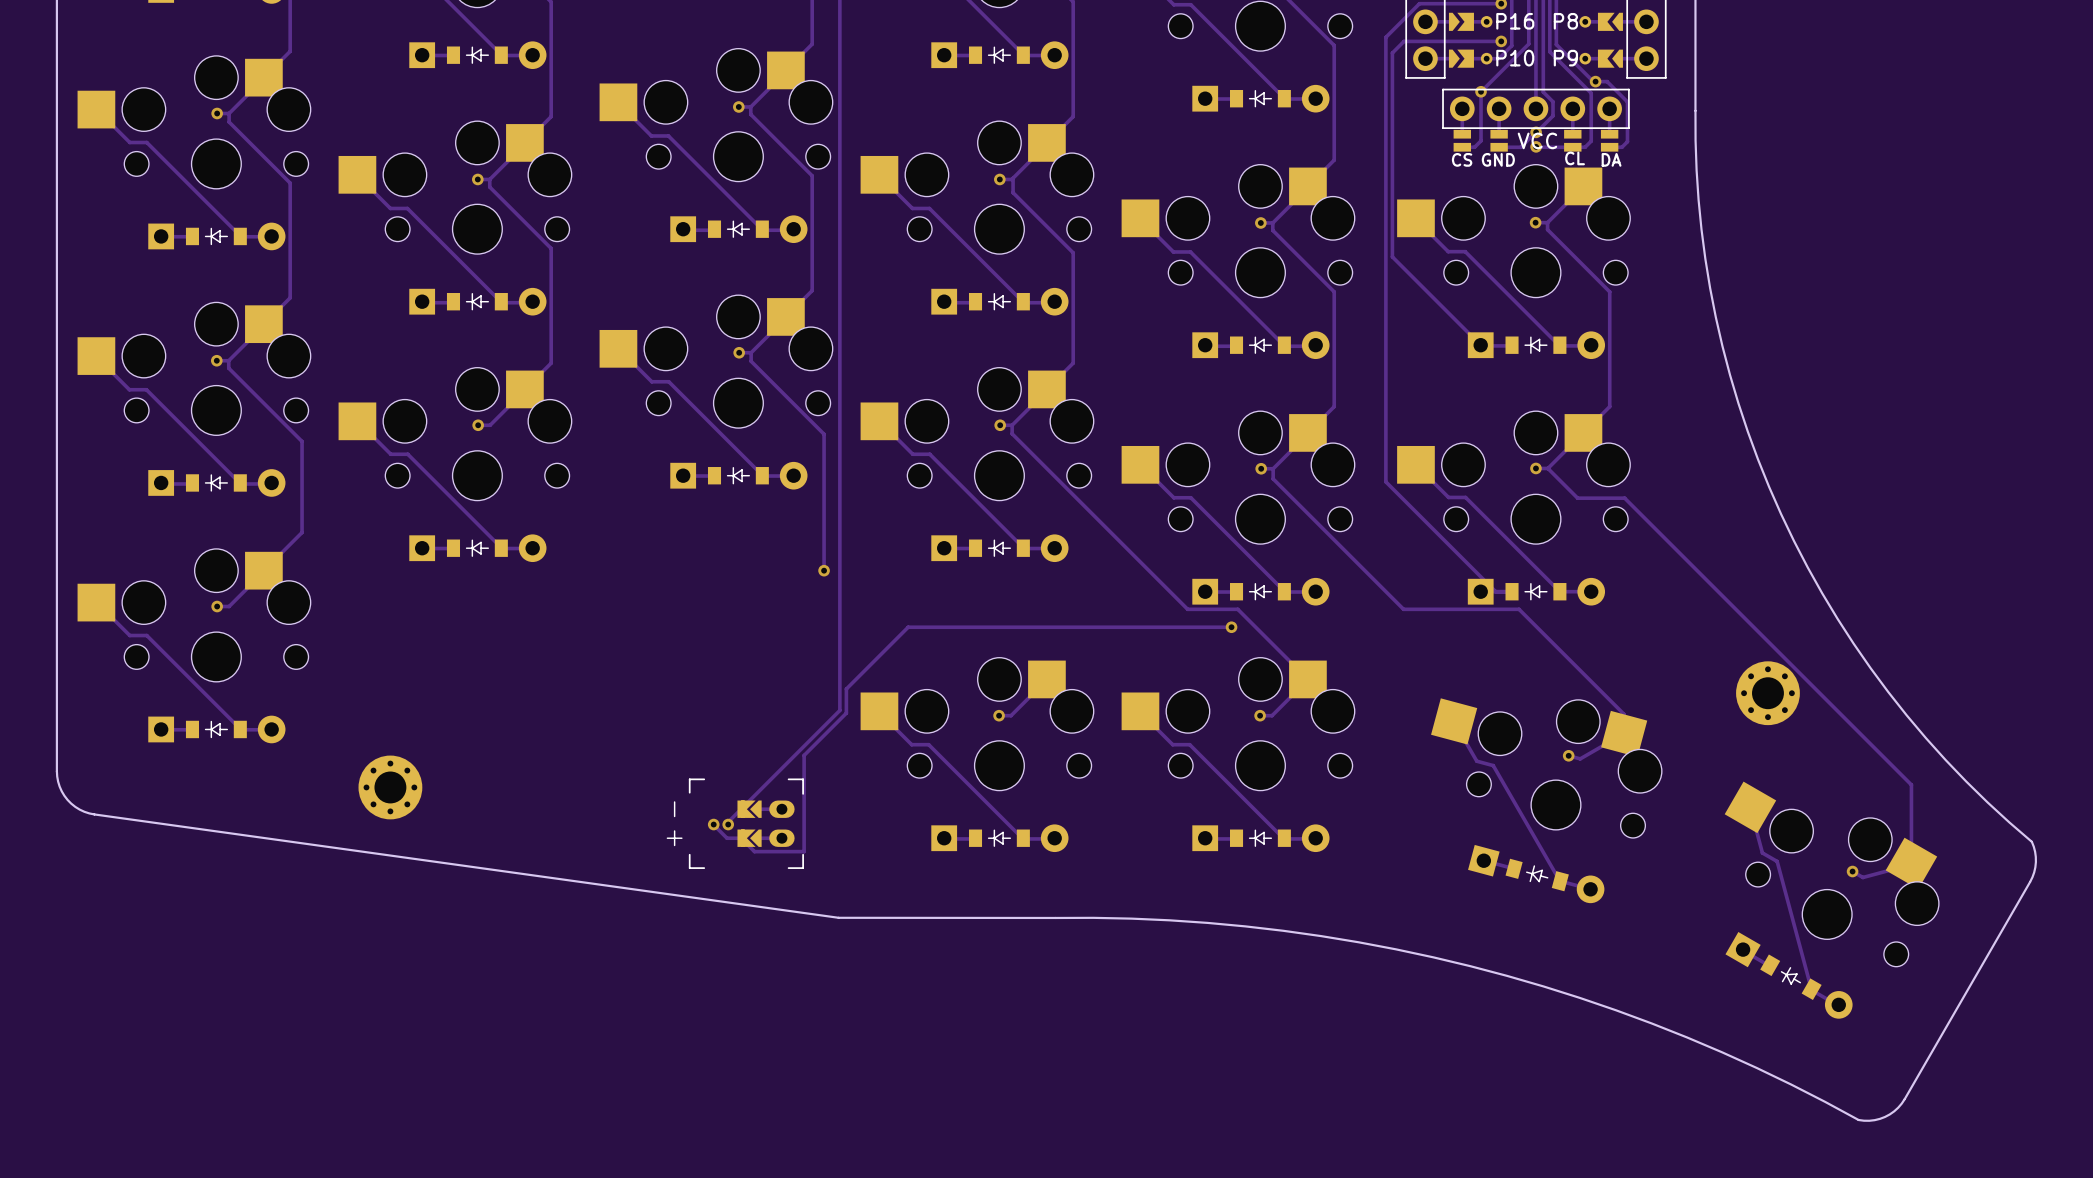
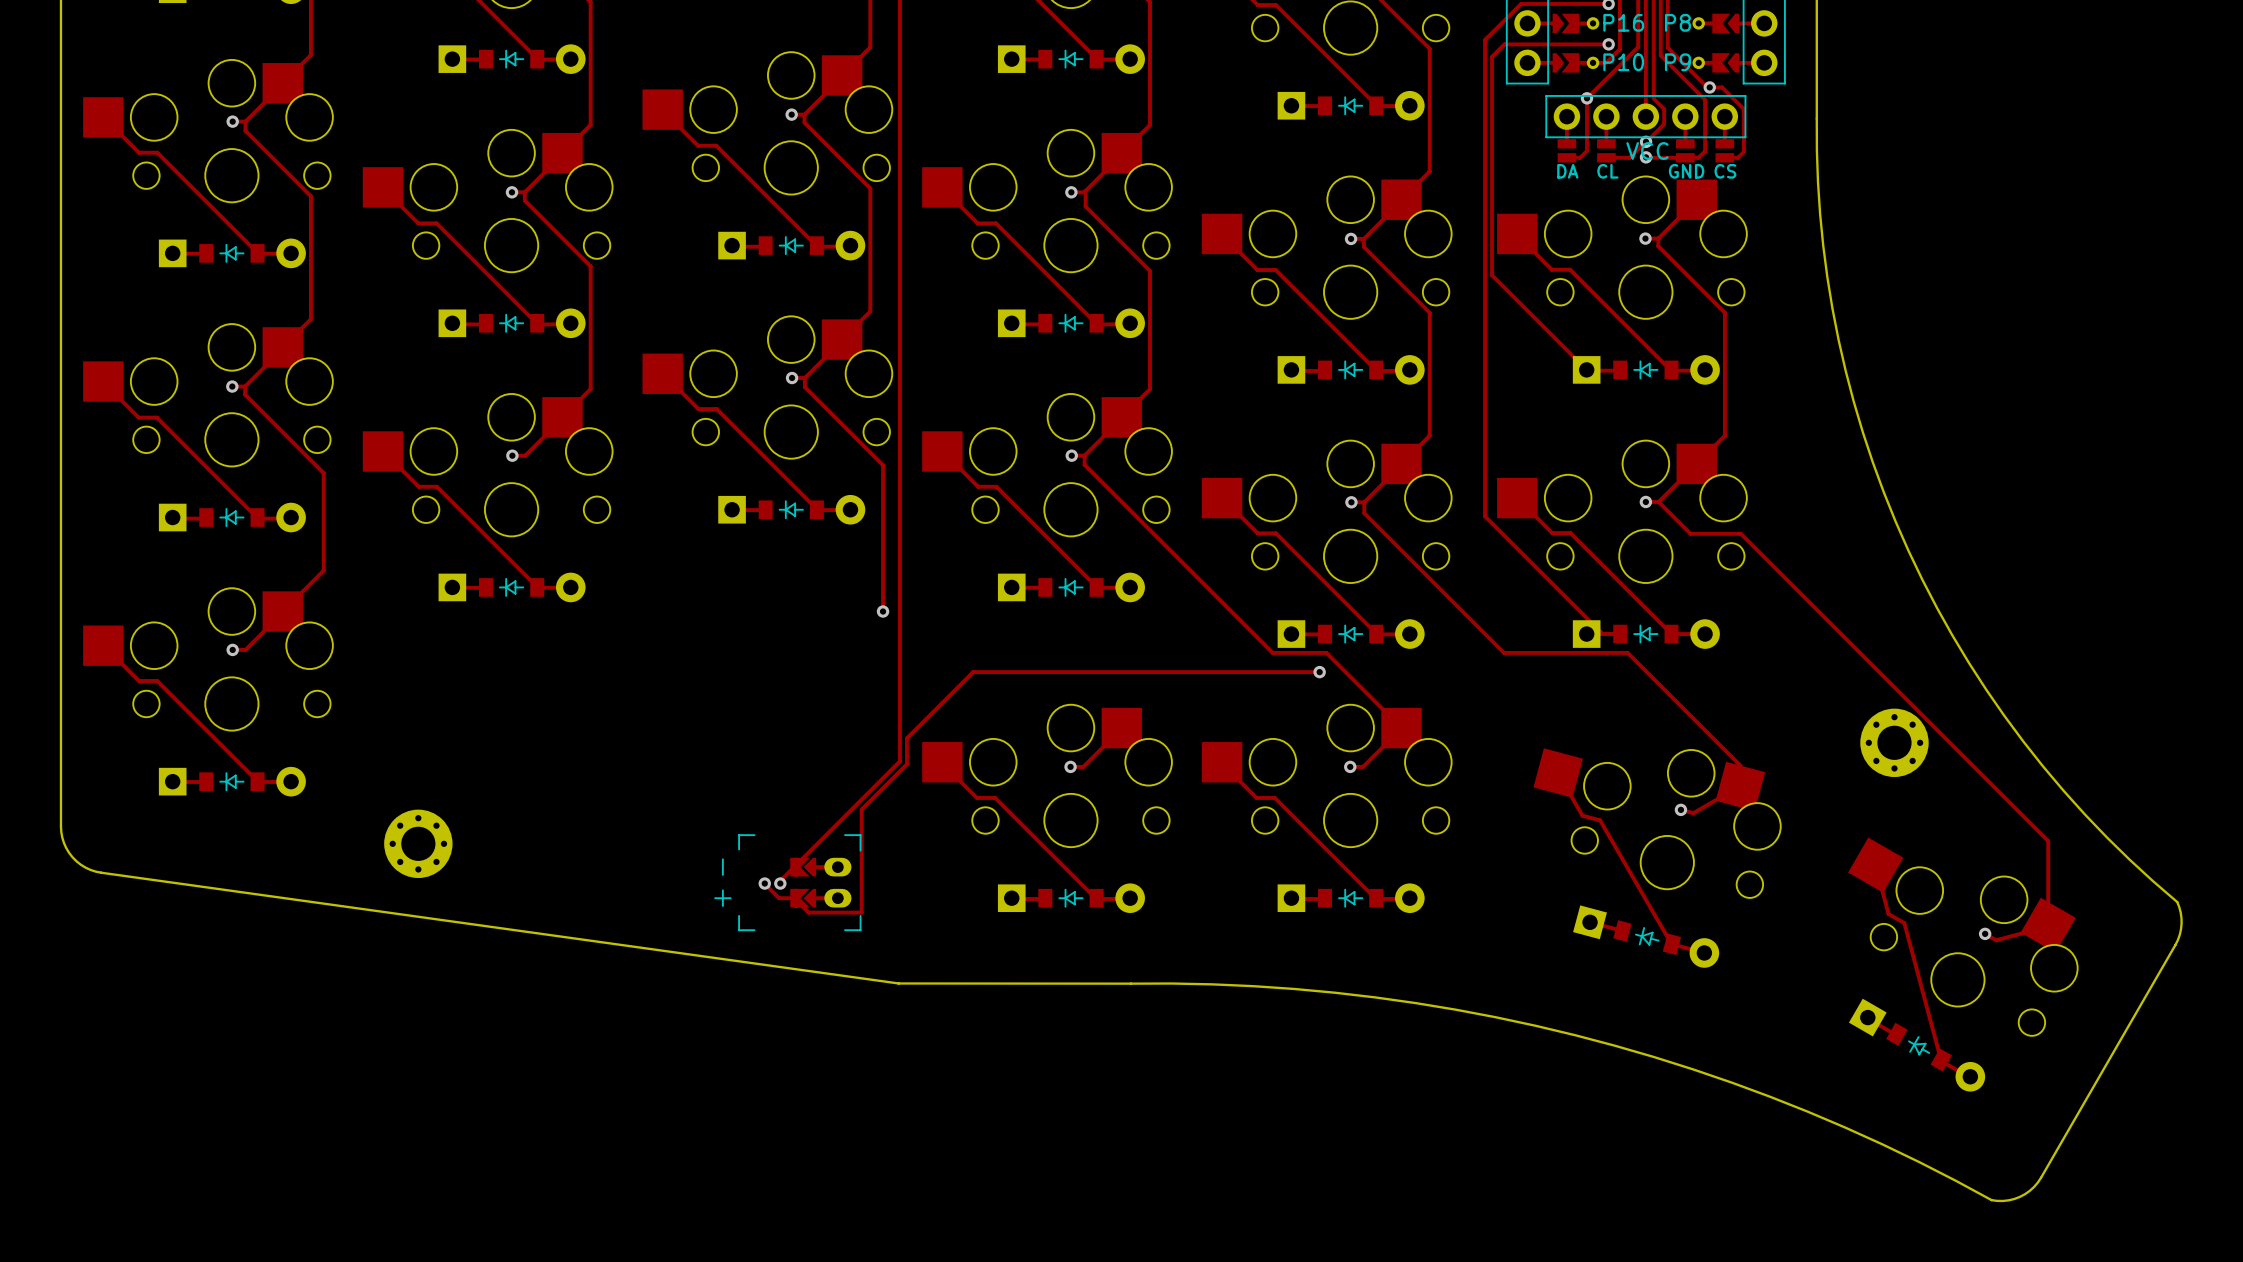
part text position: CL (1575, 158) -> CL (1607, 171)
part text: CS (1462, 159) -> DA (1567, 171)
part text position: GND (1498, 159) -> GND (1686, 171)
part text: none -> CS (1725, 171)
part text: DA (1611, 159) -> none

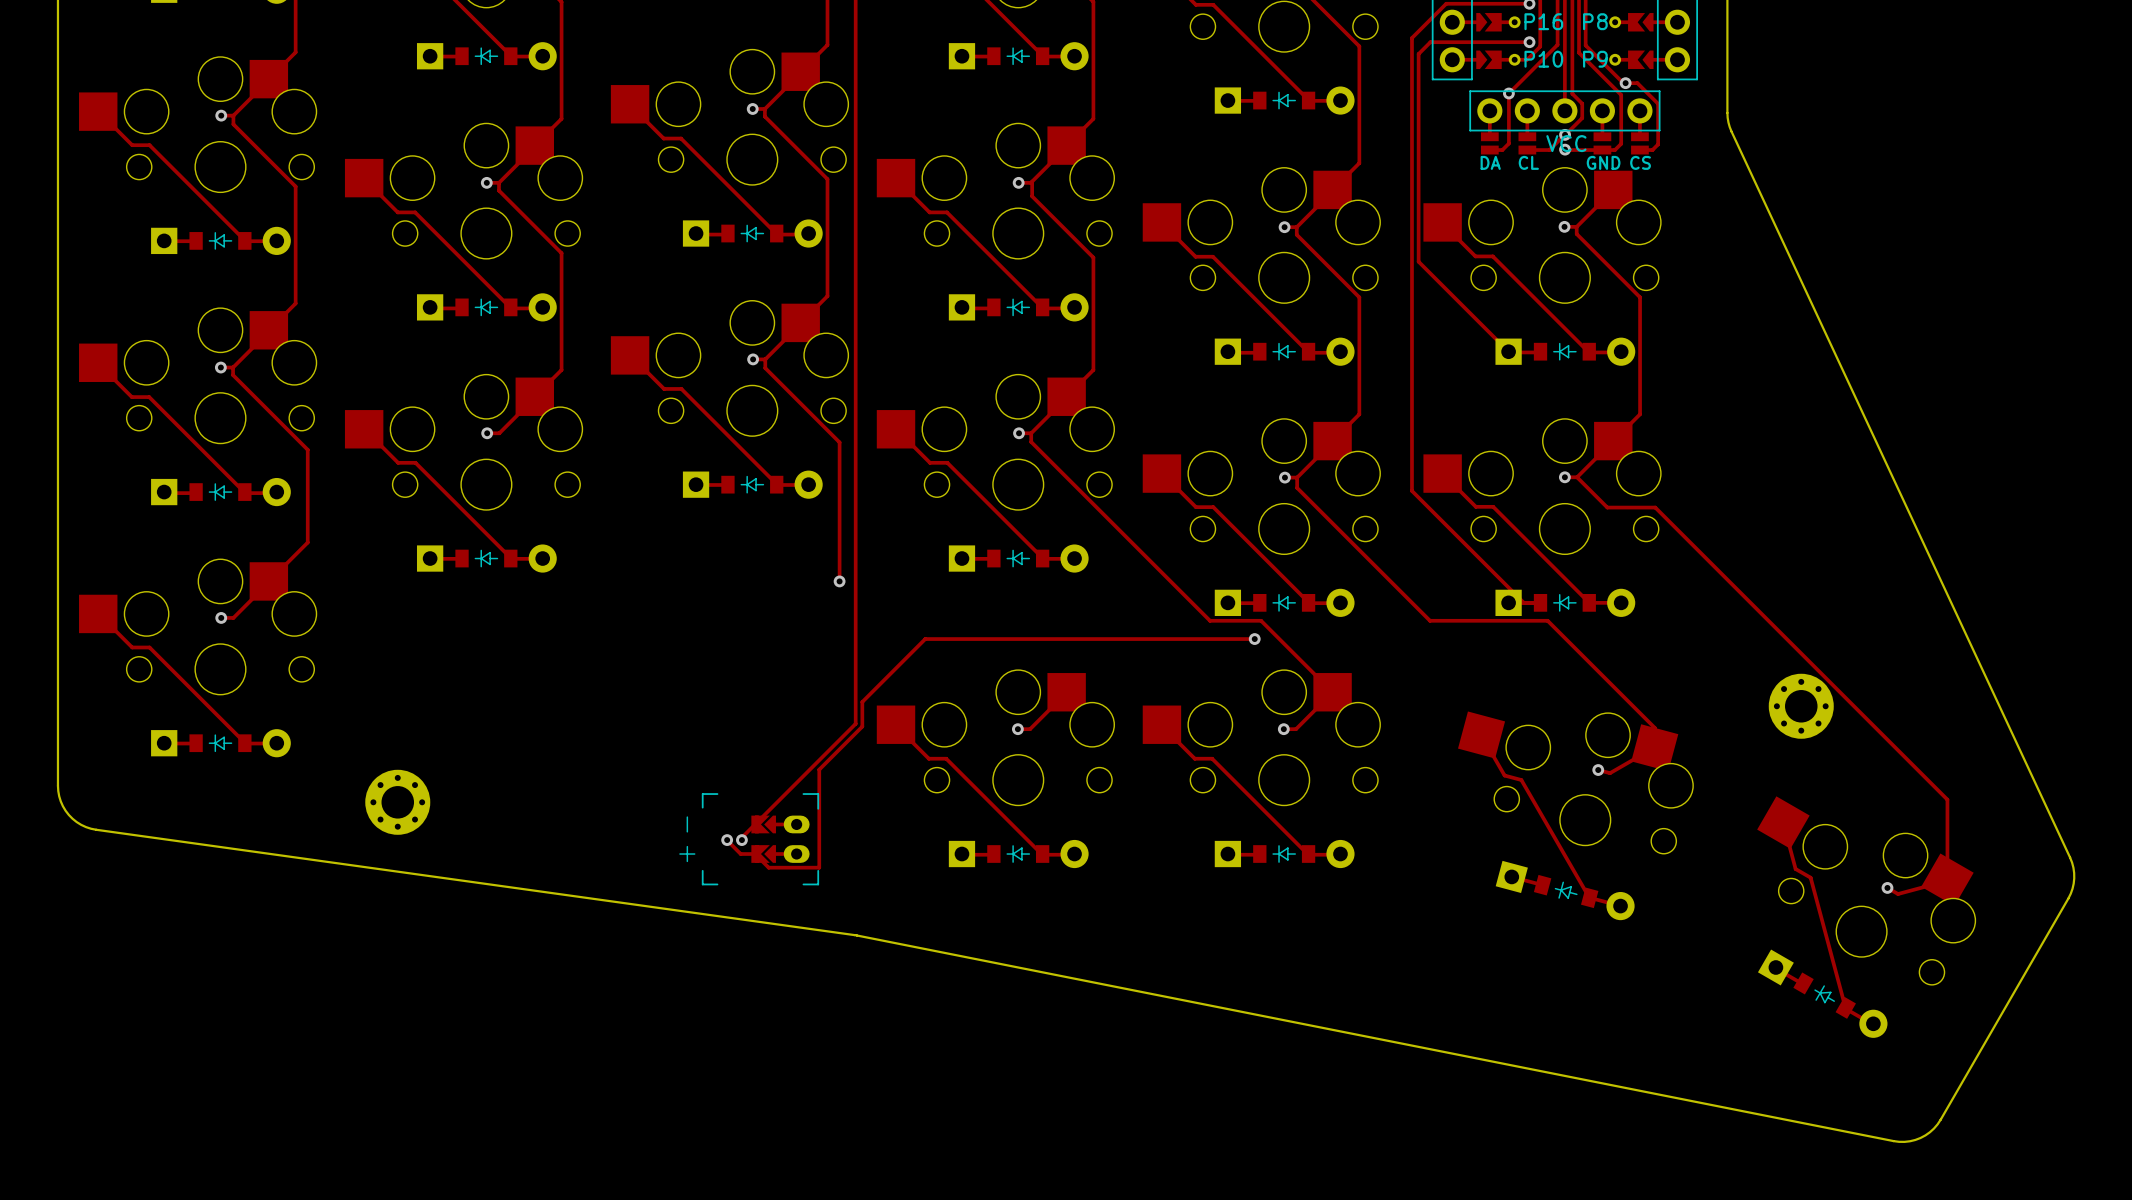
board edge: (1816, 118) (1818, 182) (1823, 245) (1838, 340) (1853, 401) (1872, 462) (1908, 551) (1937, 608) (1969, 663) (2023, 741) (2084, 814) (2129, 859) (2177, 902) -> (1727, 112) (1731, 131) (2070, 857)
board edge: (898, 983) (1171, 983) (1253, 986) (1375, 997) (1495, 1017) (1575, 1035) (1654, 1057) (1769, 1096) (1882, 1144) (1991, 1200) -> (854, 935) (1893, 1141)

